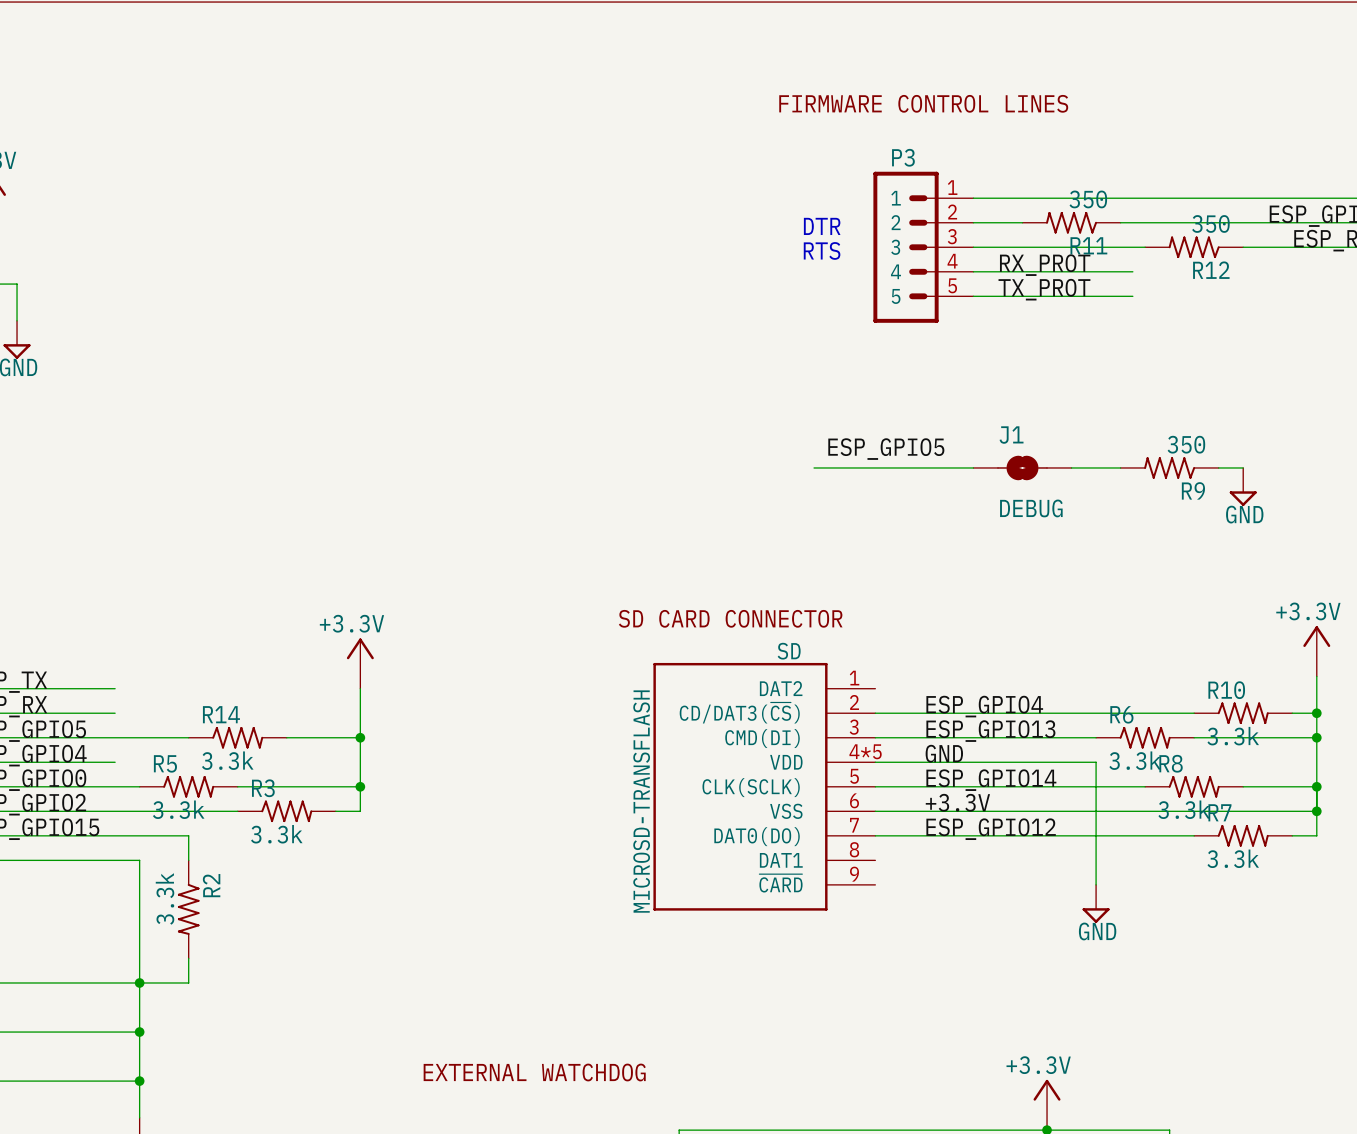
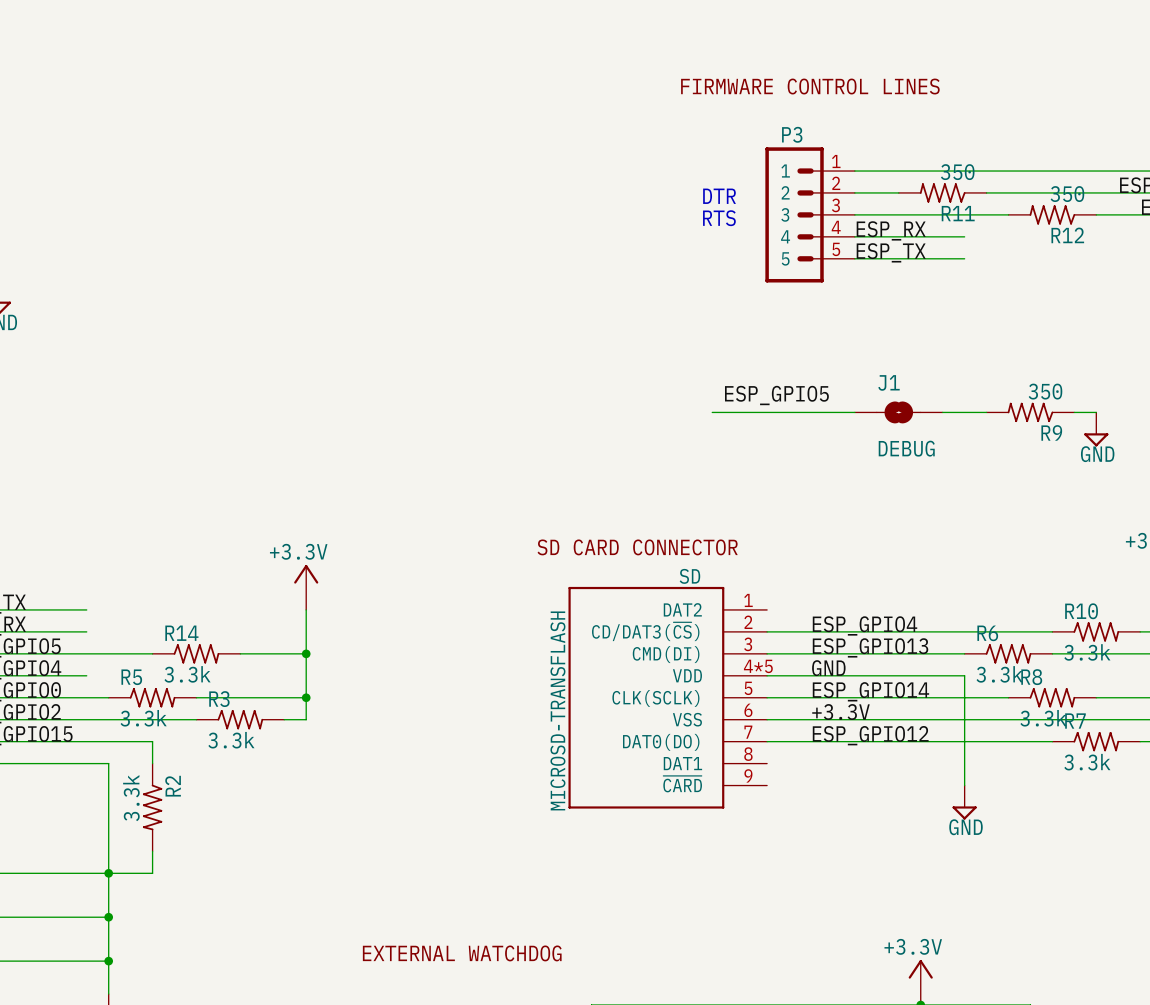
label: none -> ESP_RX (891, 230)
label: RX_PROT (1045, 265) -> none
wire: (1096, 271) (1132, 271) -> none
label: none -> ESP_TX (891, 252)
label: TX_PROT (1044, 289) -> none
wire: (1096, 296) (1132, 296) -> none

